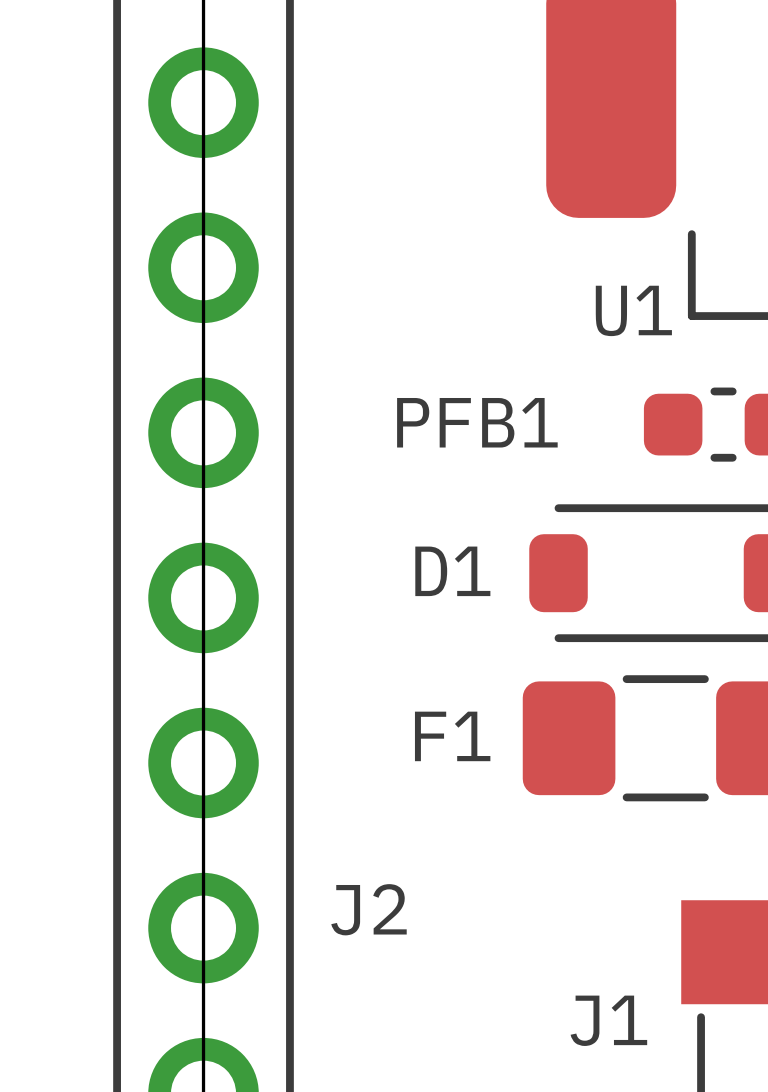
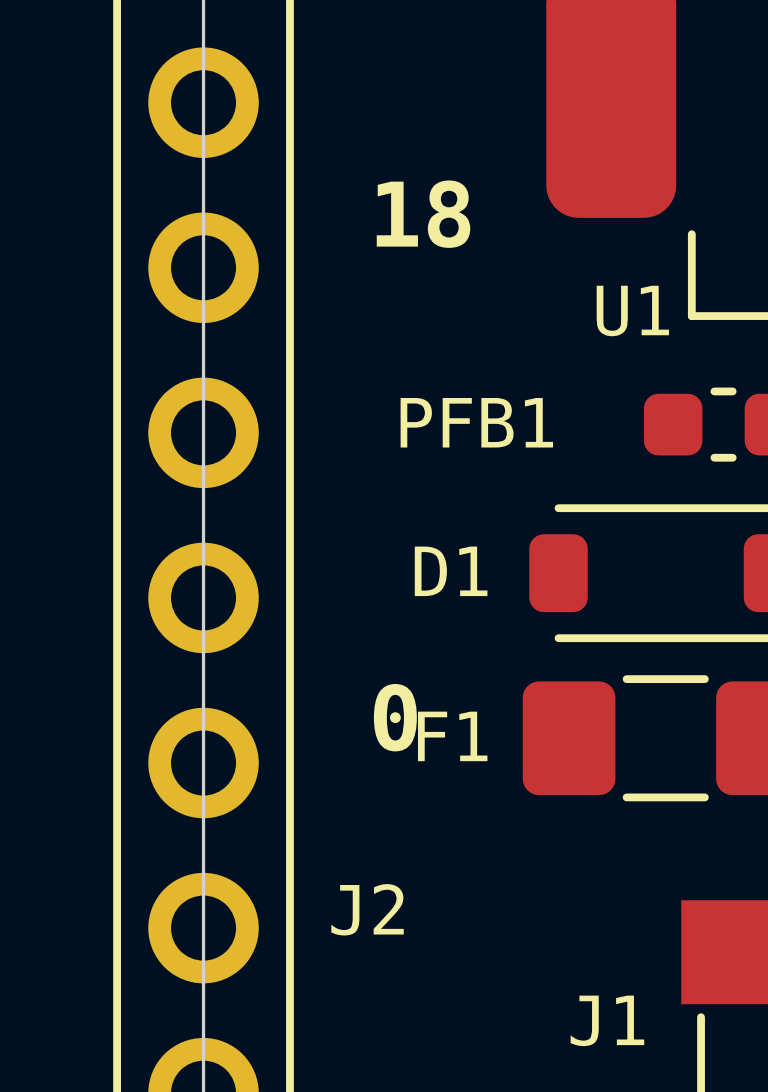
text: none -> 18 (423, 214)
text: none -> 0 (395, 717)

